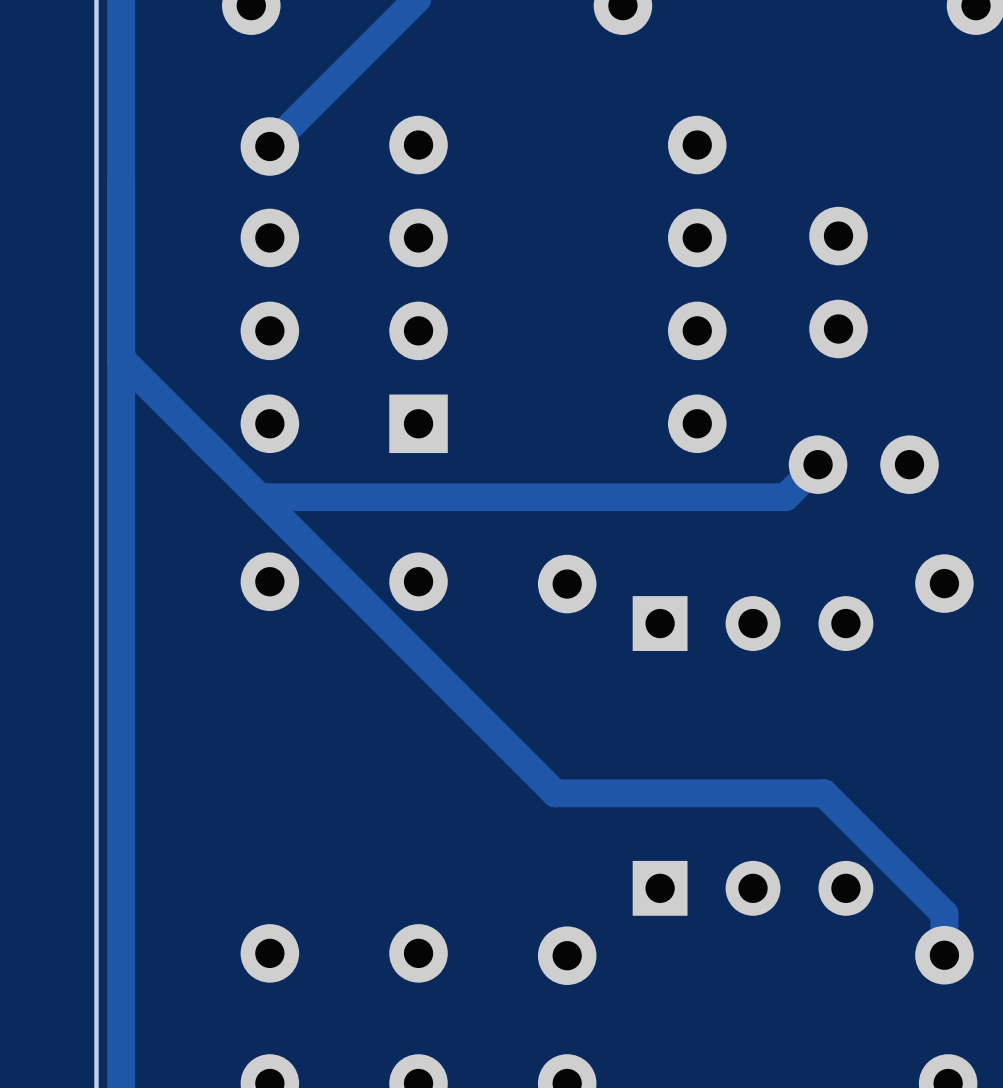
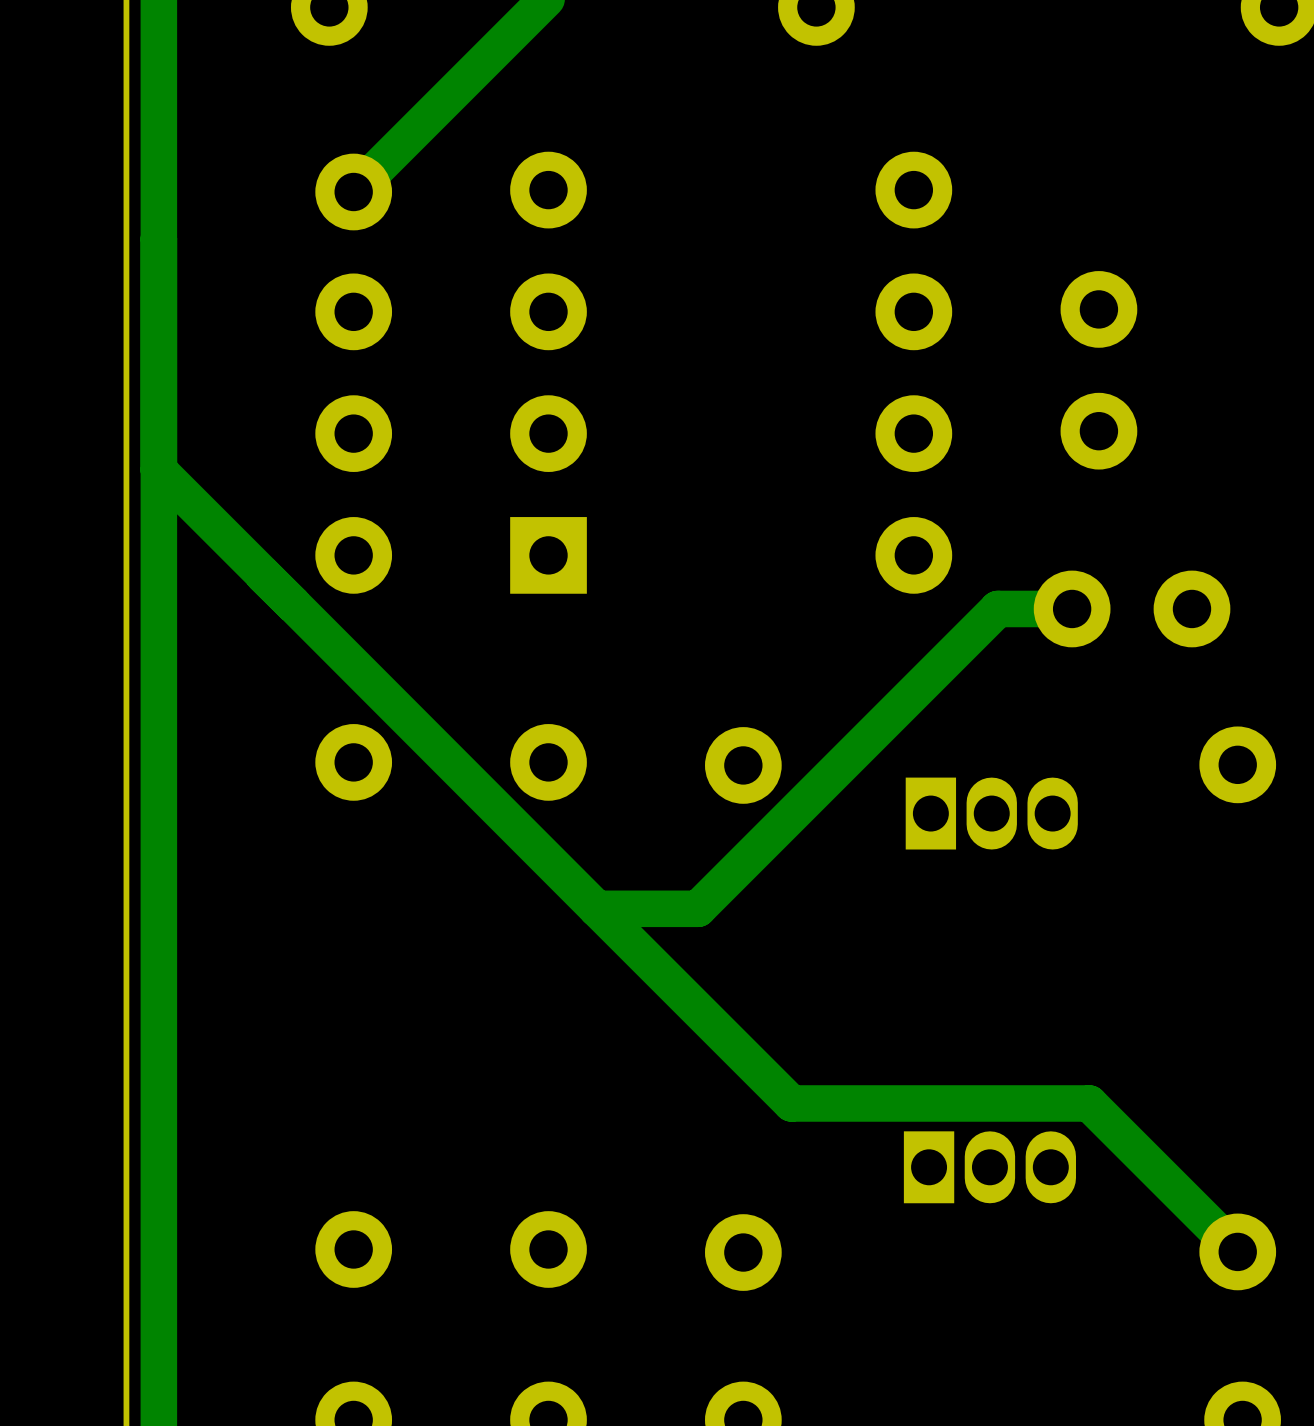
track: (818, 464) (785, 497) (259, 497) -> (1072, 608) (997, 608) (697, 908) (596, 908)
part footprint: [632, 596, 874, 651] -> [905, 777, 1078, 850]
track: (555, 793) (823, 793) (944, 913) (944, 955) -> (727, 1039) (791, 1103) (1089, 1103) (1237, 1251)
part footprint: [632, 860, 874, 916] -> [903, 1131, 1076, 1204]

